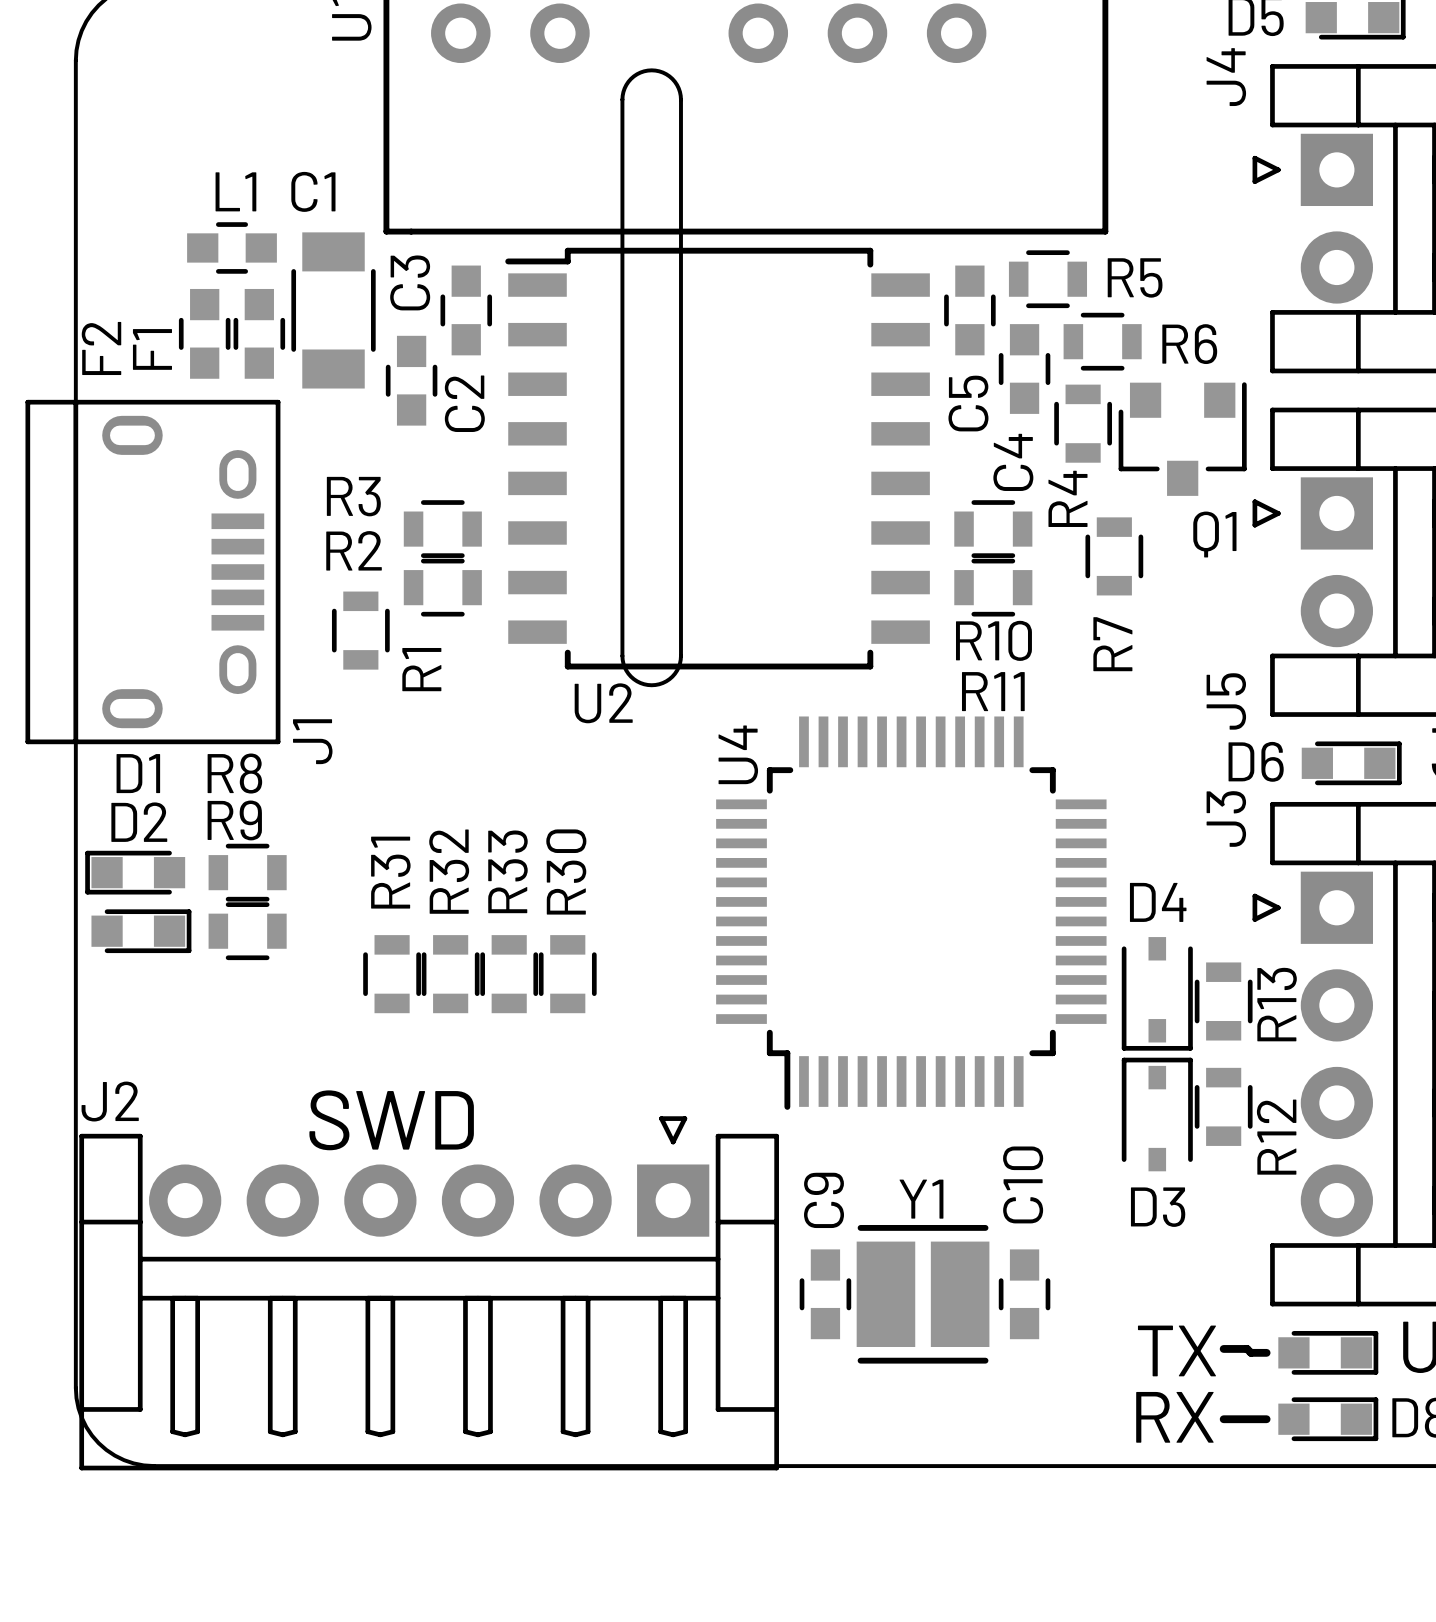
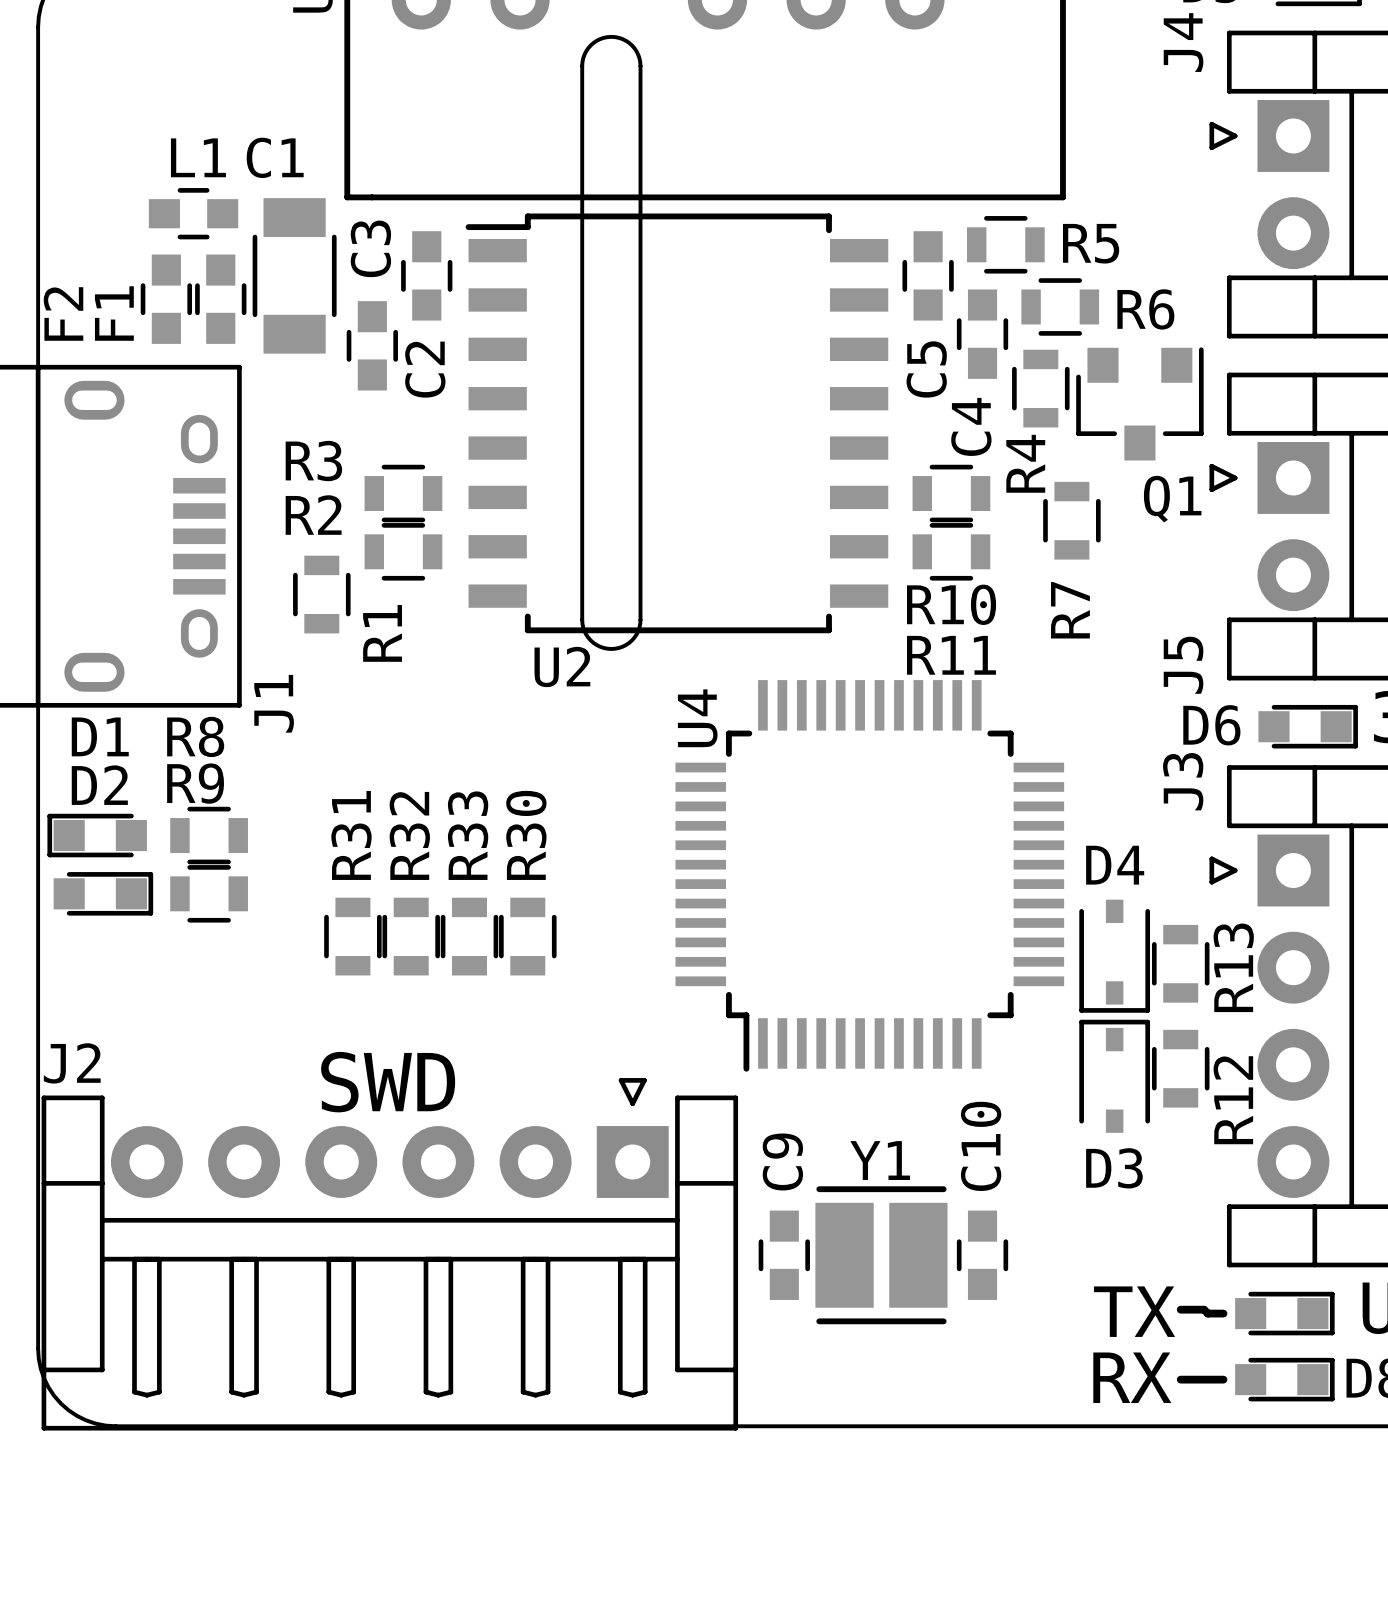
text position: SWD (391, 1120) -> SWD (388, 1082)

